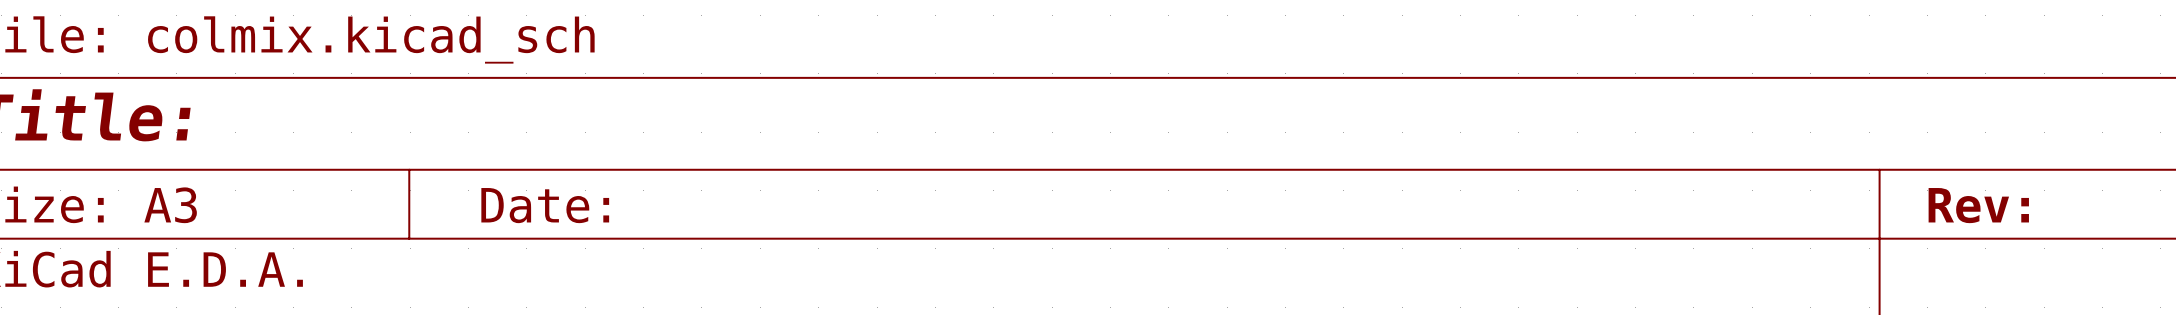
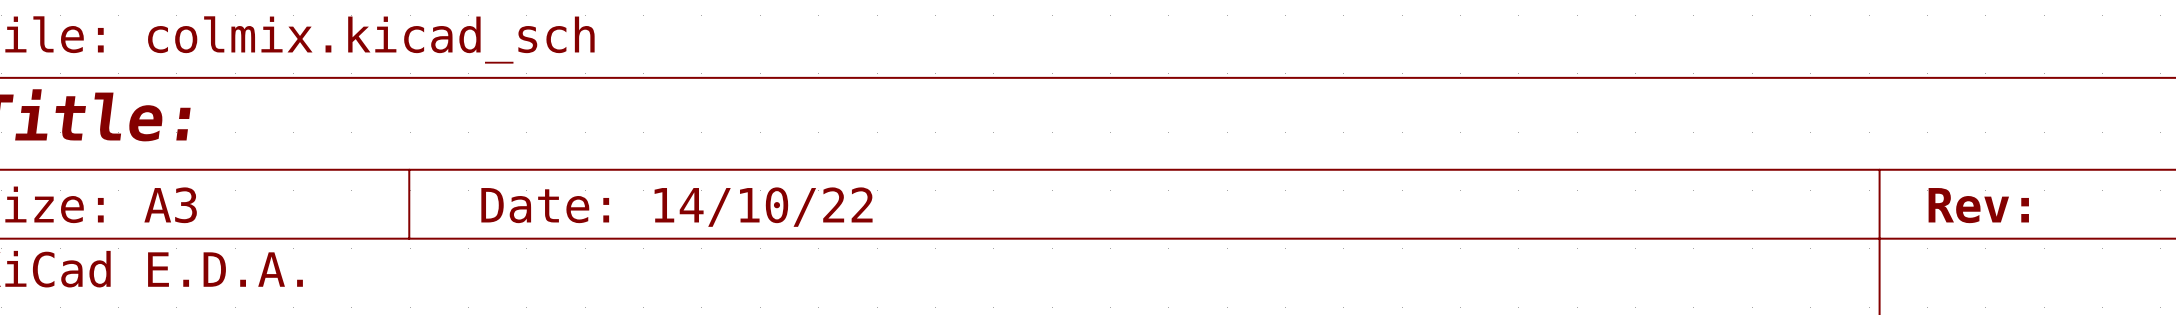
title block: Date: (545, 205) -> Date: 14/10/22 (676, 207)

